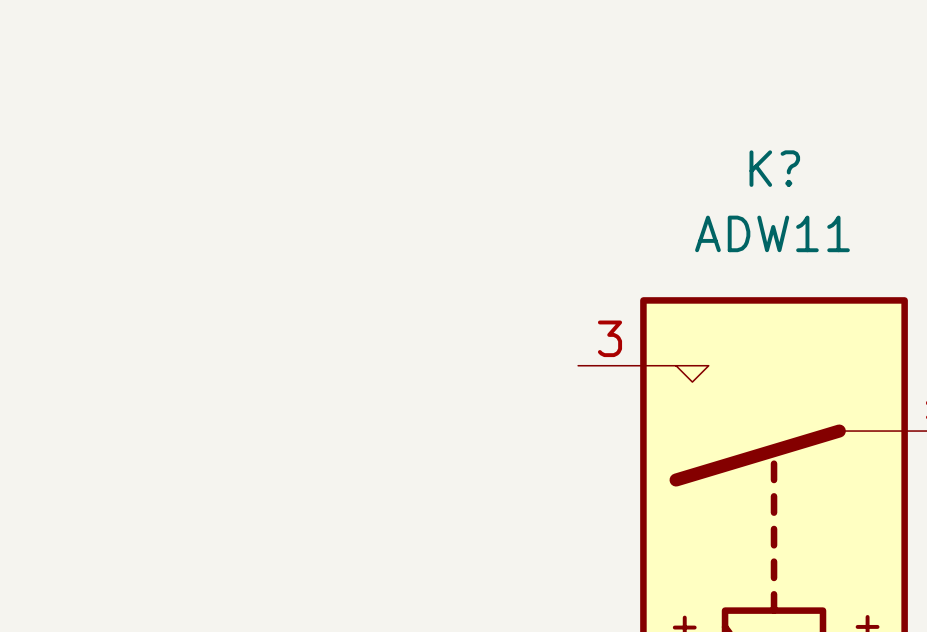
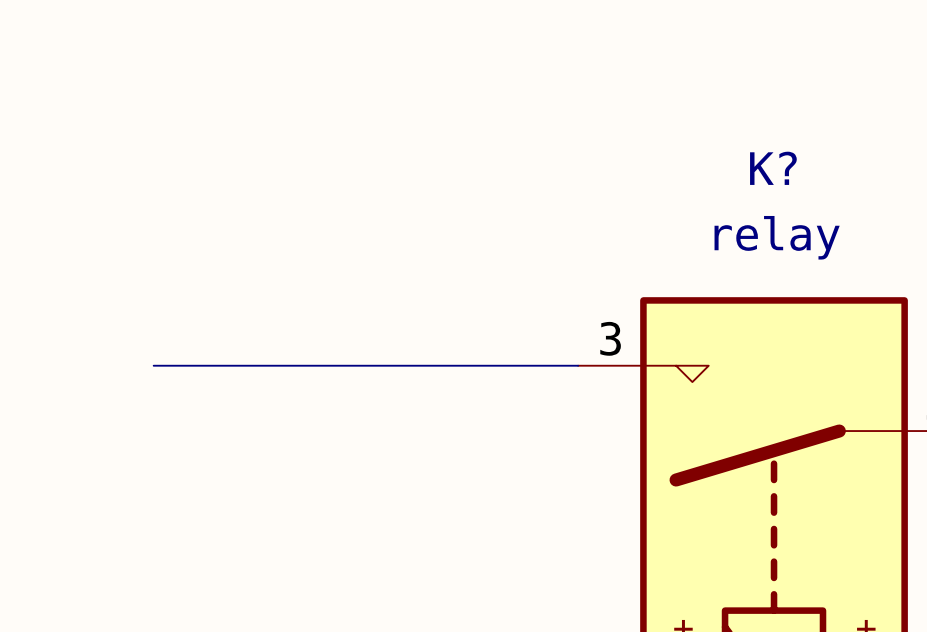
K? value: ADW11 (772, 233) -> relay (777, 237)
wire: none -> (153, 365) (578, 365)

